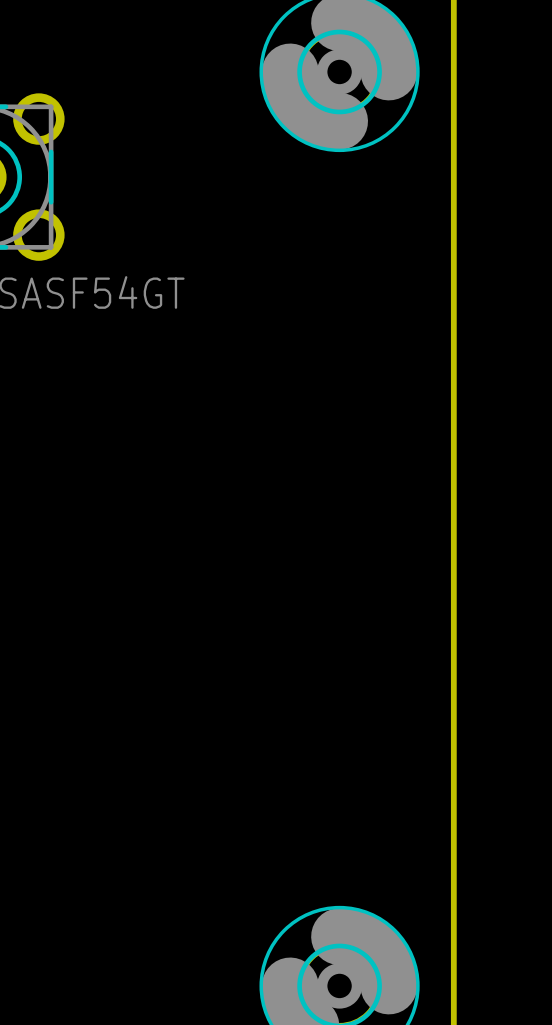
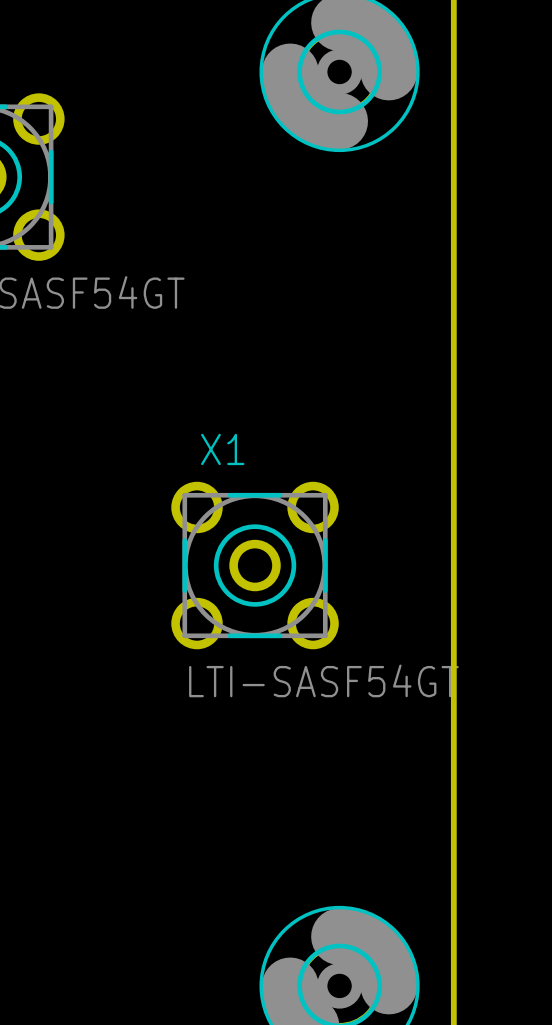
X1: none -> LTI-SASF54GT (255, 565)

